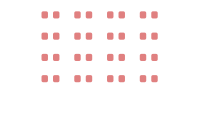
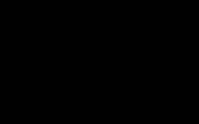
part: (50, 14) -> none
part: (83, 14) -> none
part: (115, 14) -> none
part: (148, 14) -> none
part: (50, 36) -> none
part: (83, 36) -> none
part: (115, 36) -> none
part: (148, 36) -> none
part: (50, 57) -> none
part: (83, 57) -> none
part: (115, 57) -> none
part: (148, 57) -> none
part: (50, 78) -> none
part: (83, 78) -> none
part: (115, 78) -> none
part: (148, 78) -> none

